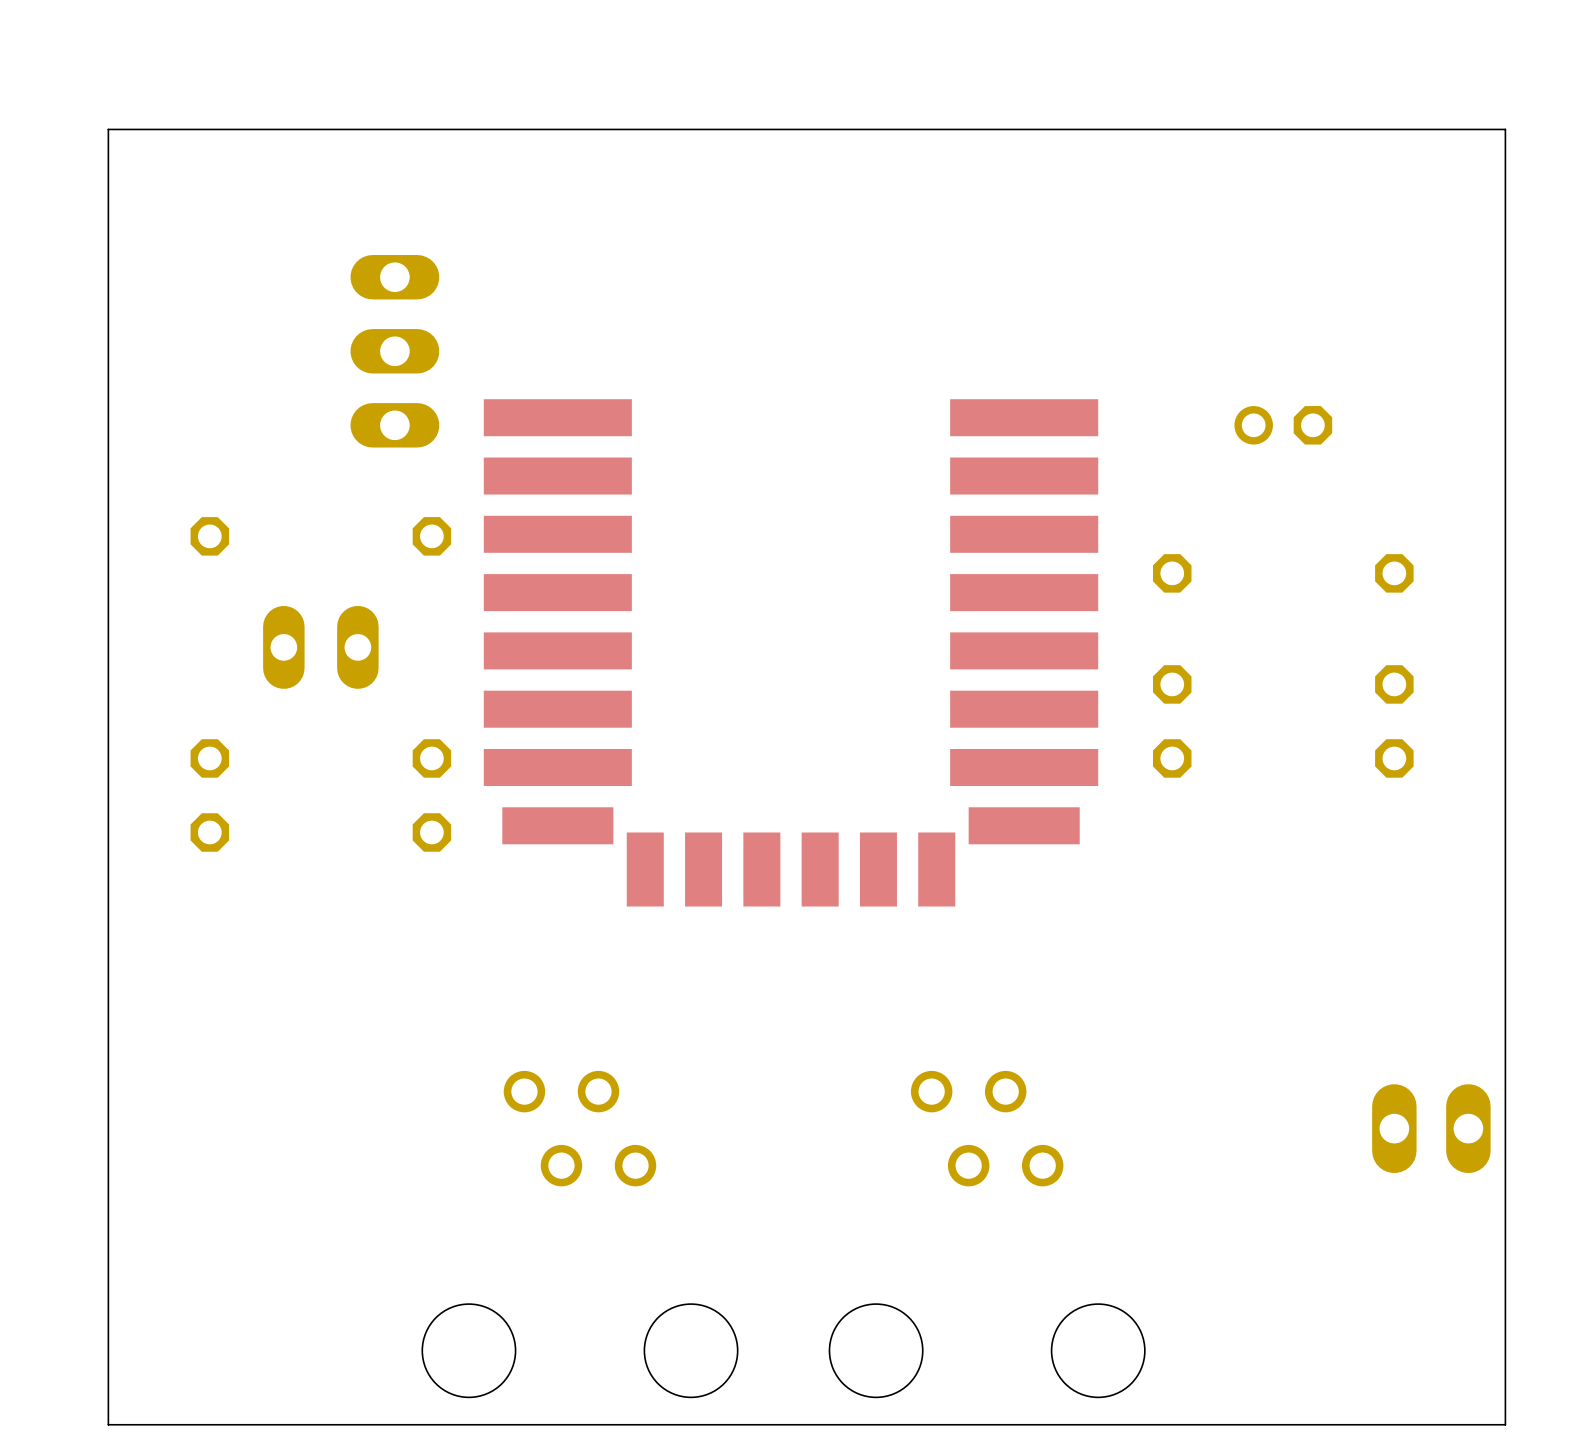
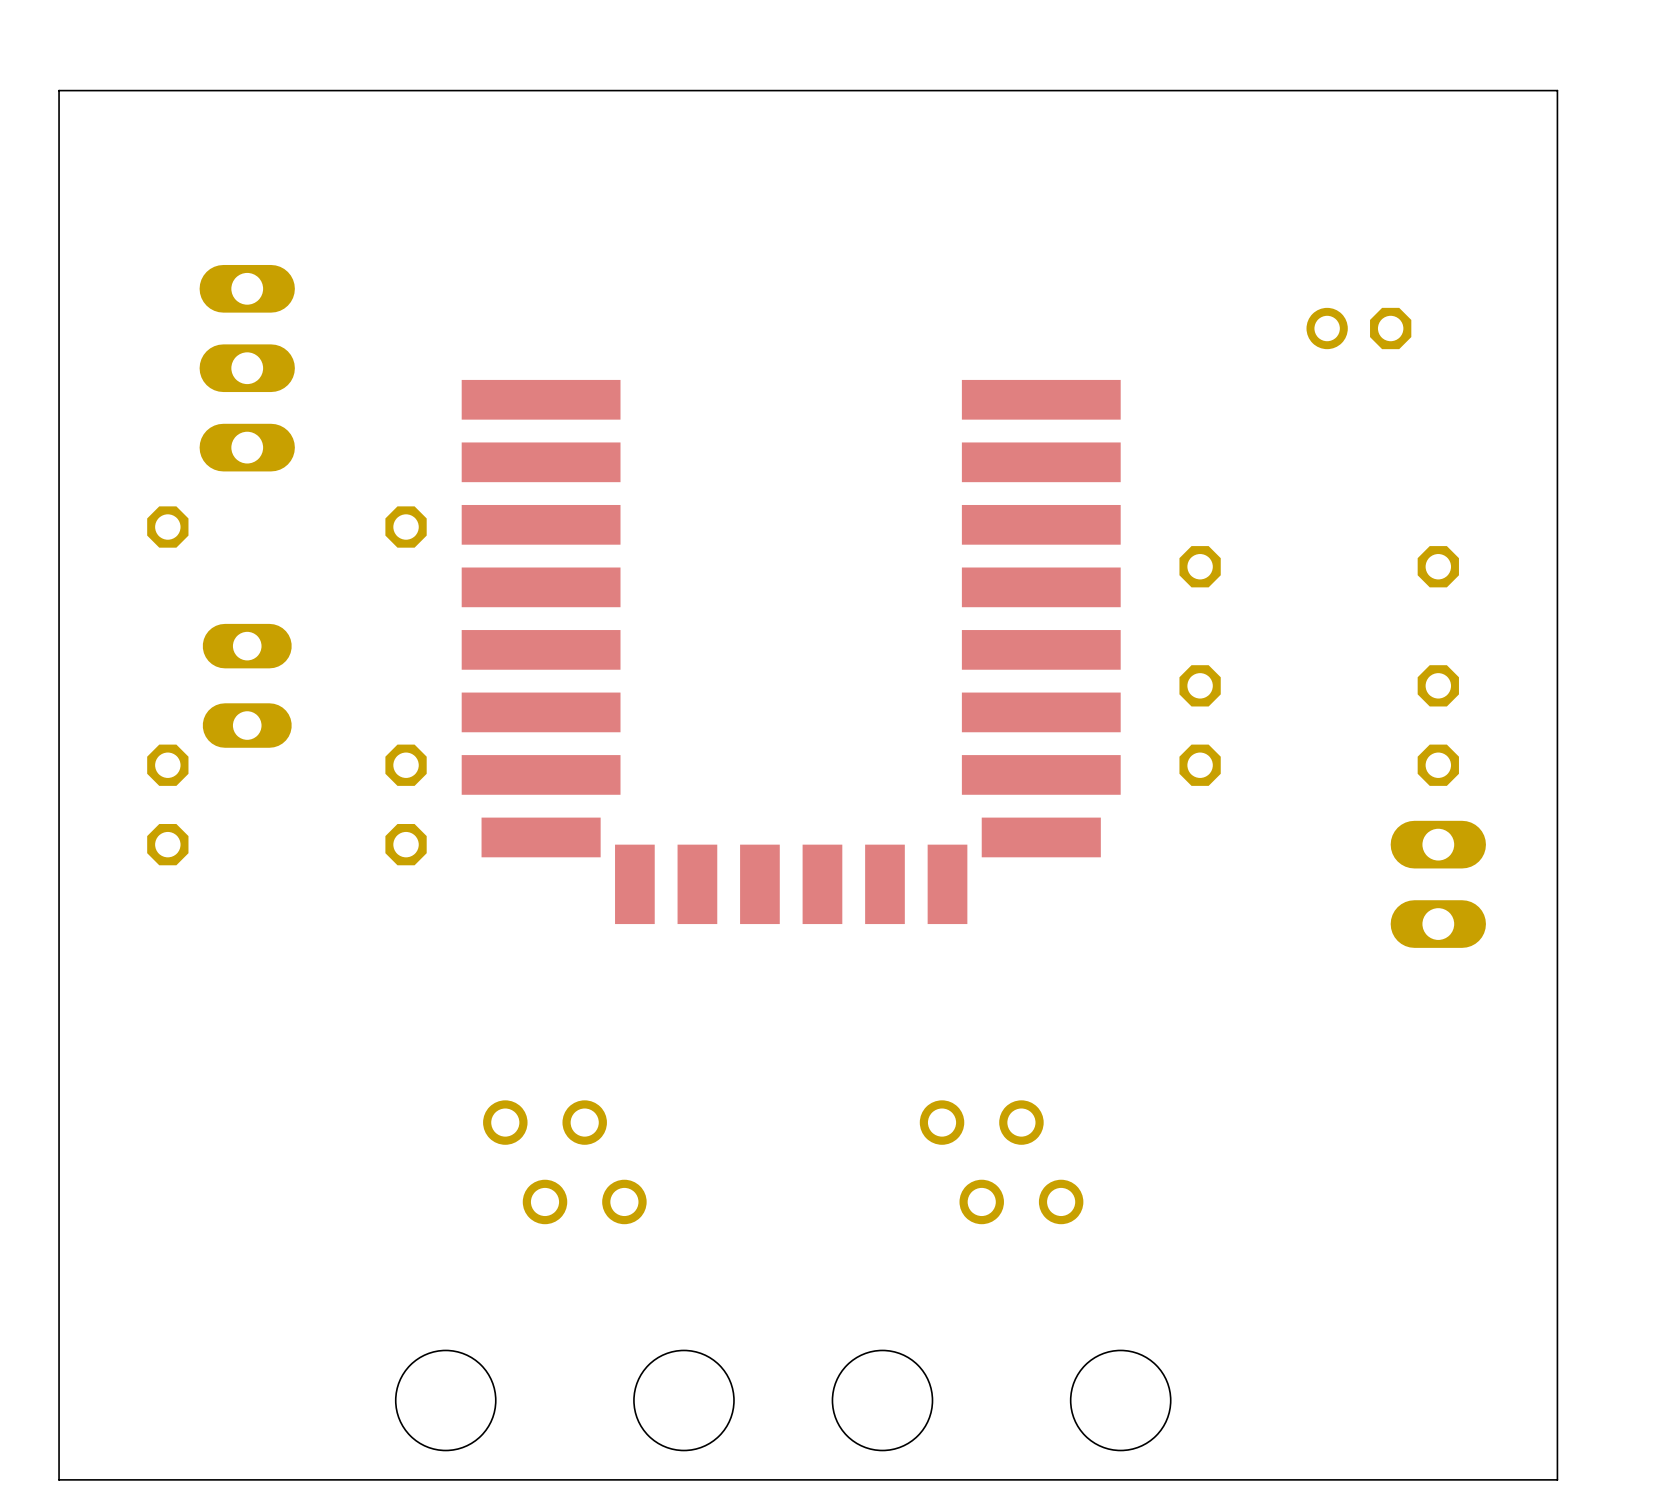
part position: (394, 351) -> (247, 368)
part position: (1283, 425) -> (1358, 328)
part rotation: 0° (320, 647) -> 90° clockwise (247, 685)
part rotation: 0° (1431, 1128) -> 90° clockwise (1438, 884)
part position: (1431, 1128) -> (1438, 884)

